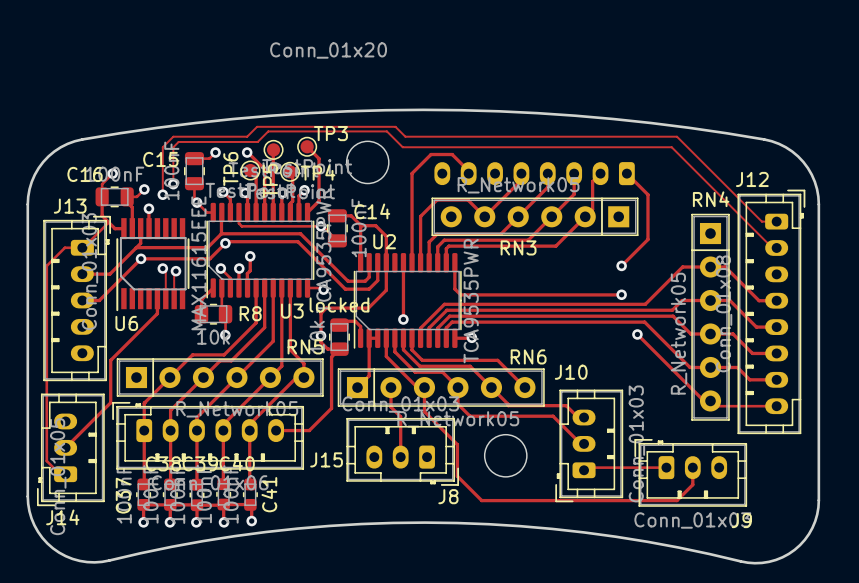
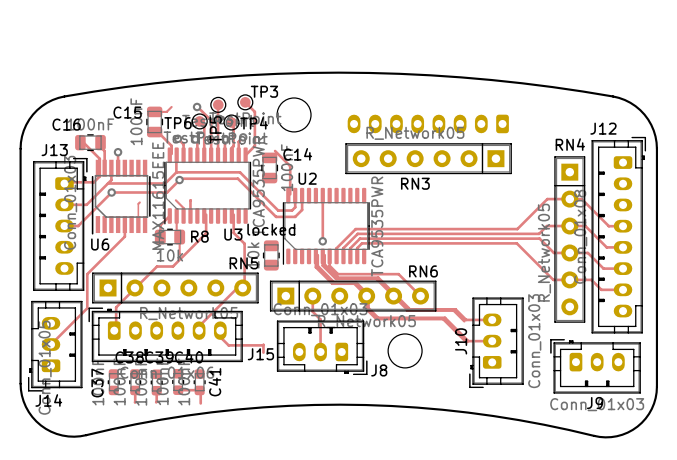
text: Conn_01x20 (328, 50) -> none
via: (215, 152) -> none
TP6 name rotation: 0° (230, 168) -> 90° clockwise (178, 123)
track: (468, 170) (452, 154) (431, 154) (412, 173) (412, 262) -> none
track: (112, 173) (102, 184) (102, 215) (115, 228) (123, 228) -> none
via: (112, 173) -> none
track: (521, 173) (521, 180) (484, 216) (467, 199) (437, 199) (420, 216) (420, 262) -> none
track: (547, 173) (547, 187) (500, 234) (437, 234) (429, 242) (429, 262) -> none
track: (574, 173) (574, 194) (528, 240) (444, 240) (437, 246) (437, 262) -> none
track: (600, 173) (592, 181) (592, 209) (555, 246) (448, 246) (446, 248) (446, 262) -> none
track: (626, 173) (647, 194) (647, 239) (621, 265) -> none
track: none -> (156, 130) (171, 145) (171, 153)
track: (194, 183) (194, 200) (206, 212) (213, 212) -> none
track: (173, 184) (173, 147) (178, 141) (257, 141) (268, 131) (386, 131) (402, 147) (671, 147) (772, 247) (776, 247) -> none
via: (173, 184) -> none
track: (144, 189) (136, 196) (127, 196) -> none
via: (144, 189) -> none
track: (162, 194) (162, 147) (173, 136) (247, 136) (257, 126) (395, 126) (405, 136) (676, 136) (761, 221) (776, 221) -> none
via: (162, 194) -> none
track: none -> (82, 141) (99, 158) (99, 176) (93, 182) (66, 182)
via: (197, 202) -> none
track: none -> (275, 151) (290, 166) (290, 194)
track: (238, 212) (238, 223) (241, 226) (322, 226) (337, 240) -> none
track: (337, 215) (351, 215) (360, 225) (360, 262) -> none
track: (108, 222) (83, 247) (64, 247) (46, 265) (46, 461) (59, 474) (65, 474) -> none
track: (360, 225) (375, 225) (386, 236) (386, 290) (368, 308) (326, 308) (321, 313) (321, 342) (327, 349) (339, 349) (331, 357) (331, 408) (309, 430) (276, 430) -> none
via: (321, 226) -> none
track: (250, 256) (247, 288) -> none
via: (250, 256) -> none
track: (454, 262) (454, 289) (460, 294) (621, 294) -> none
via: (621, 265) -> none
track: (162, 268) (165, 271) (165, 298) -> none
via: (162, 268) -> none
via: (220, 268) -> none
via: (239, 268) -> none
via: (175, 271) -> none
track: none -> (206, 214) (206, 233) (172, 266) (157, 266) (116, 307) (116, 329)
track: none -> (233, 214) (233, 232) (244, 243) (244, 286) (238, 286) (201, 324) (201, 329)
track: (256, 288) (256, 322) (224, 354) (192, 354) (144, 403) (143, 484) -> none
track: (264, 288) (264, 327) (231, 360) (220, 360) (170, 410) (170, 484) -> none
track: (273, 288) (273, 341) (196, 417) (196, 484) -> none
track: (281, 288) (281, 366) (223, 424) (223, 484) -> none
track: (290, 288) (290, 349) (303, 363) (303, 377) (296, 377) (249, 424) (250, 484) -> none
track: (307, 288) (323, 289) -> none
via: (323, 289) -> none
via: (621, 294) -> none
track: (339, 325) (343, 321) (355, 321) (360, 326) (360, 338) -> none
track: (637, 334) (703, 400) (712, 400) (717, 406) (776, 406) -> none
via: (637, 334) -> none
via: (225, 335) -> none
via: (321, 335) -> none
track: none -> (317, 255) (317, 266) (334, 282) (356, 282) (368, 294) (368, 308) (378, 317) (445, 317) (468, 341) (492, 341)
track: none -> (324, 255) (324, 264) (337, 277) (378, 277) (408, 309) (455, 309) (466, 319) (492, 319)
track: (471, 337) (454, 338) -> none
via: (471, 337) -> none
track: (377, 338) (369, 338) (369, 375) (357, 387) -> none
track: (386, 338) (386, 356) (417, 387) (424, 387) (424, 411) (457, 444) (457, 476) (481, 500) (676, 500) (692, 484) (692, 467) -> none
J10 name rotation: 0° (571, 372) -> 90° counterclockwise (461, 341)
J10 name position: J10 (571, 372) -> J10 (461, 341)
track: none -> (222, 329) (222, 338) (228, 345) (263, 344) (263, 352)
J10 position: (589, 445) -> (496, 342)
track: (667, 467) (586, 467) (584, 470) -> none
J9 position: (690, 472) -> (595, 366)
J8 name position: J8 (448, 496) -> J8 (379, 370)
track: (224, 519) (223, 504) (143, 504) (143, 522) -> none
via: (251, 521) -> none
via: (143, 522) -> none
via: (169, 522) -> none
via: (196, 522) -> none
via: (224, 522) -> none

